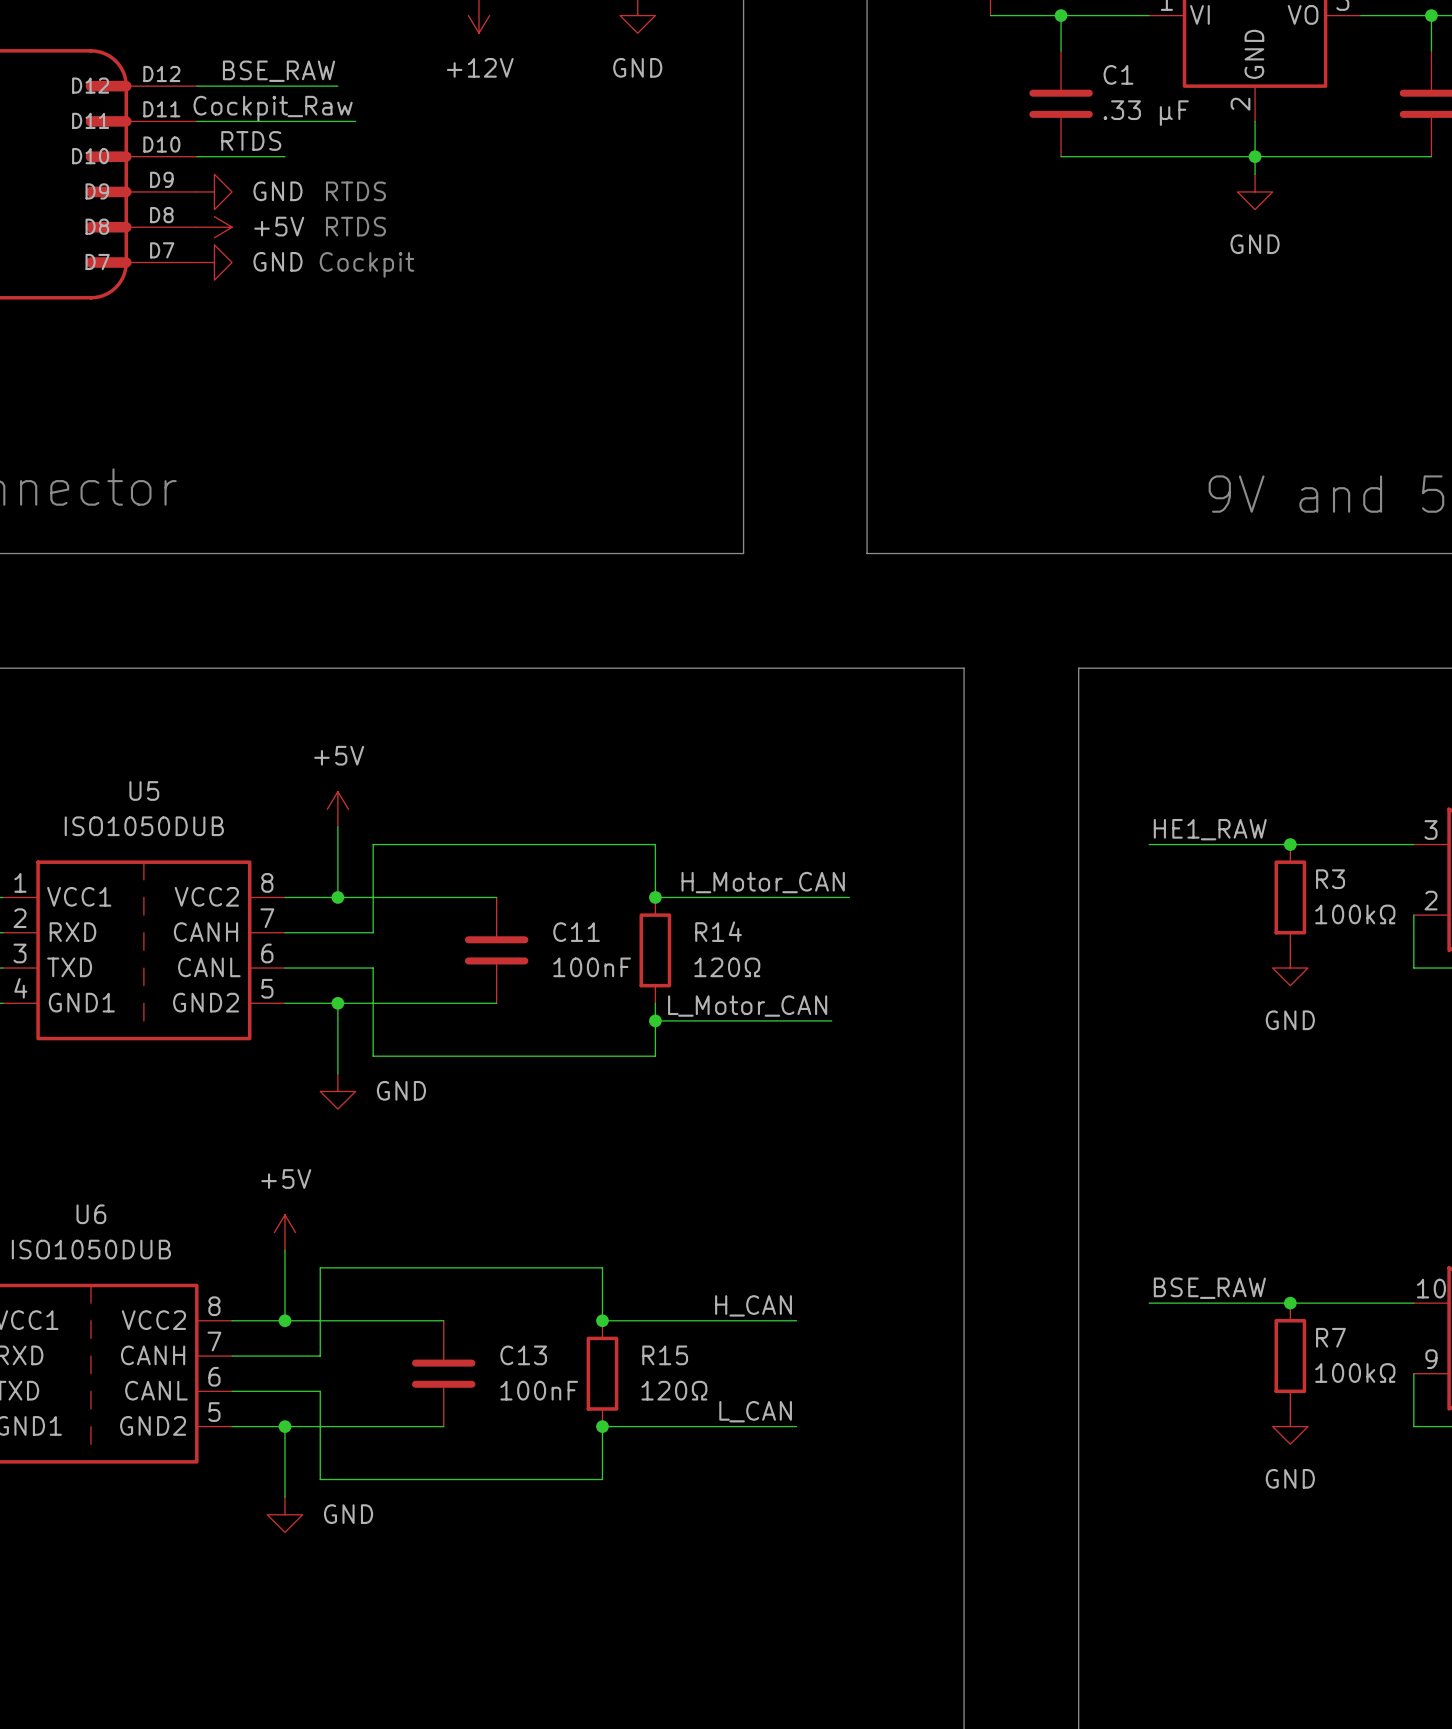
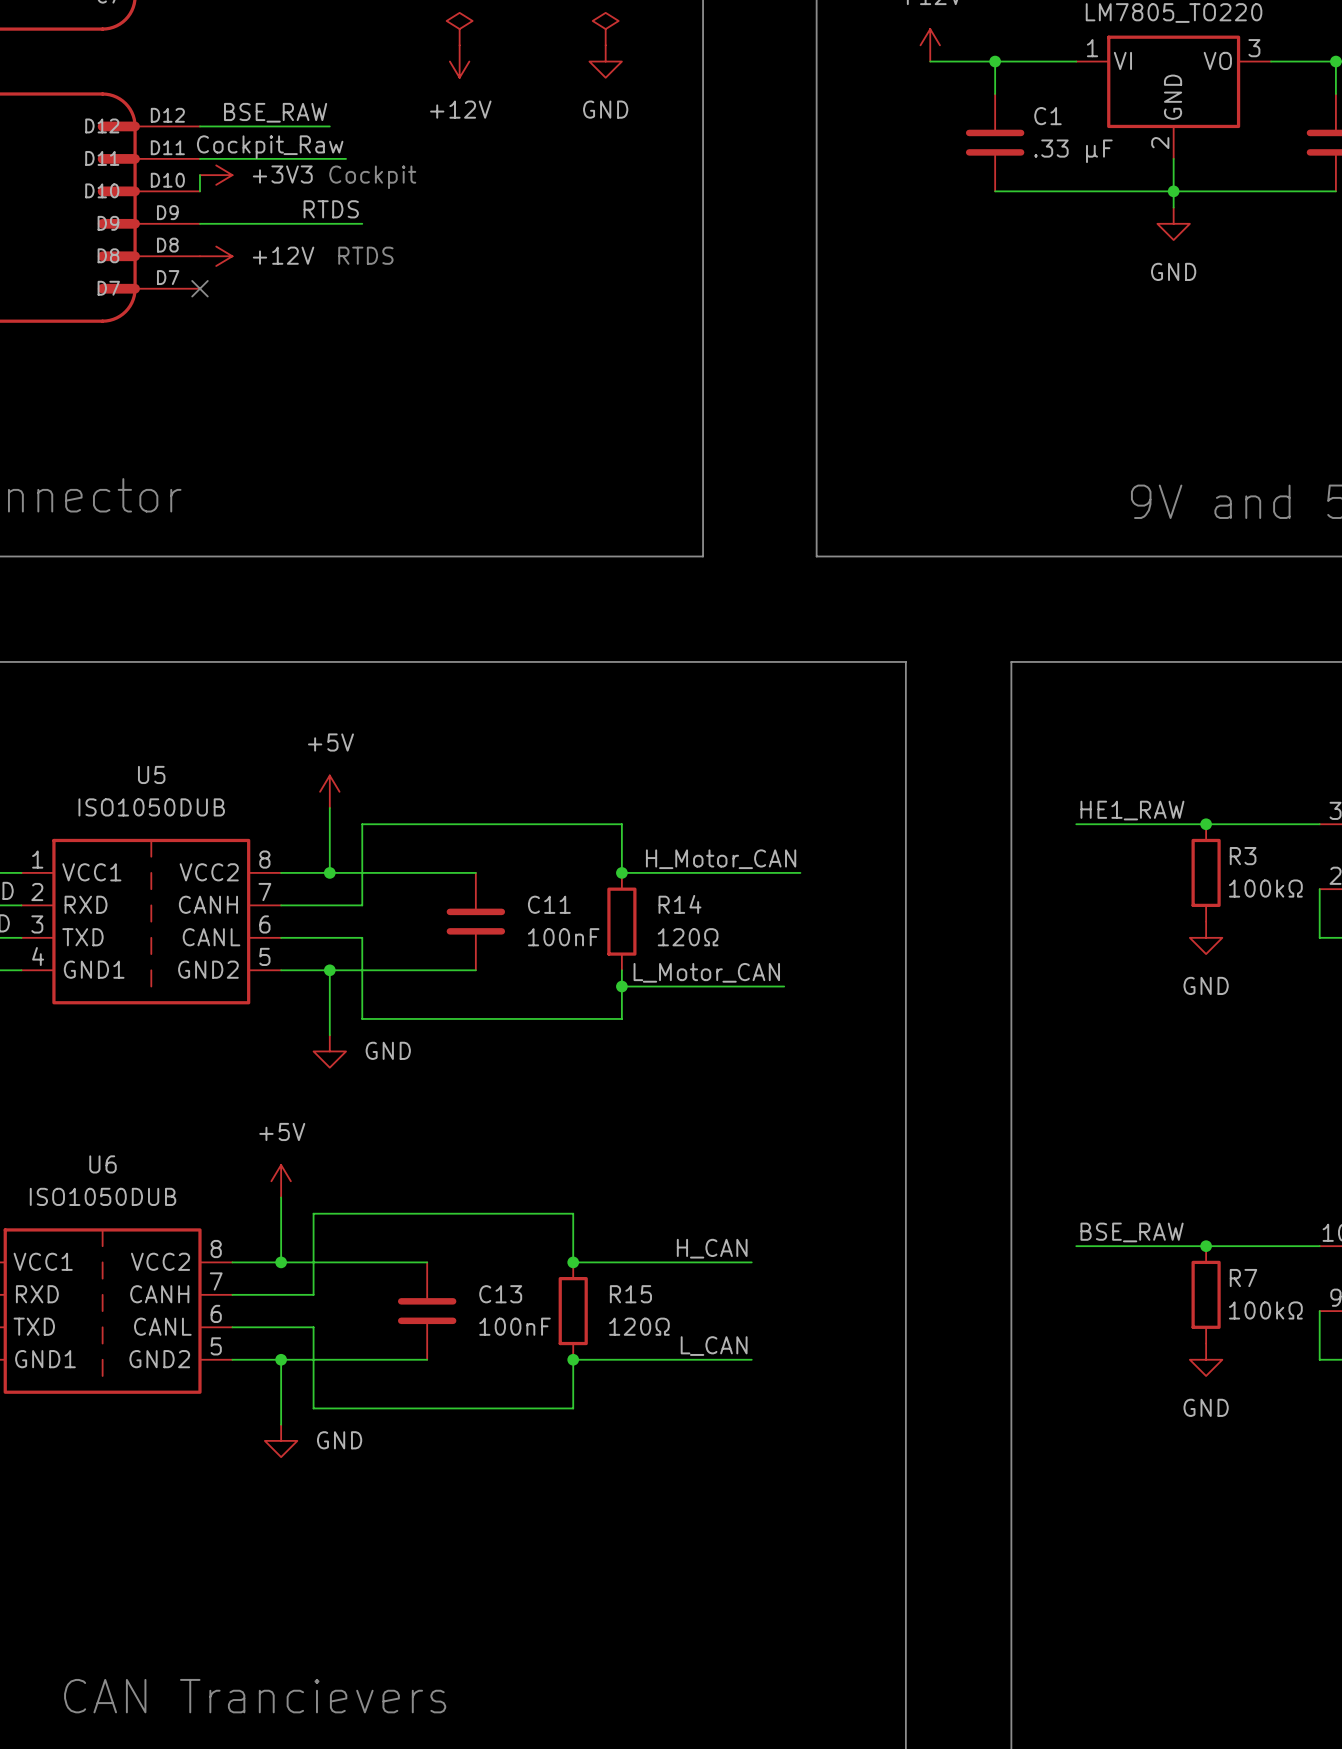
power symbol: none -> +3V3 (216, 175)
label position: RTDS (251, 140) -> RTDS (331, 209)
wire: (196, 156) (284, 156) -> (199, 191) (199, 175)
wire: none -> (199, 223) (362, 223)
power symbol: GND (214, 191) -> none
text: RTDS (355, 191) -> none
text: RTDS (355, 226) -> none
text: none -> RTDS (365, 255)
power symbol: +5V (214, 227) -> +12V (216, 256)
no-connect mark: none -> (199, 288)
power symbol: GND (214, 262) -> none
text position: Cockpit (366, 264) -> Cockpit (372, 177)

